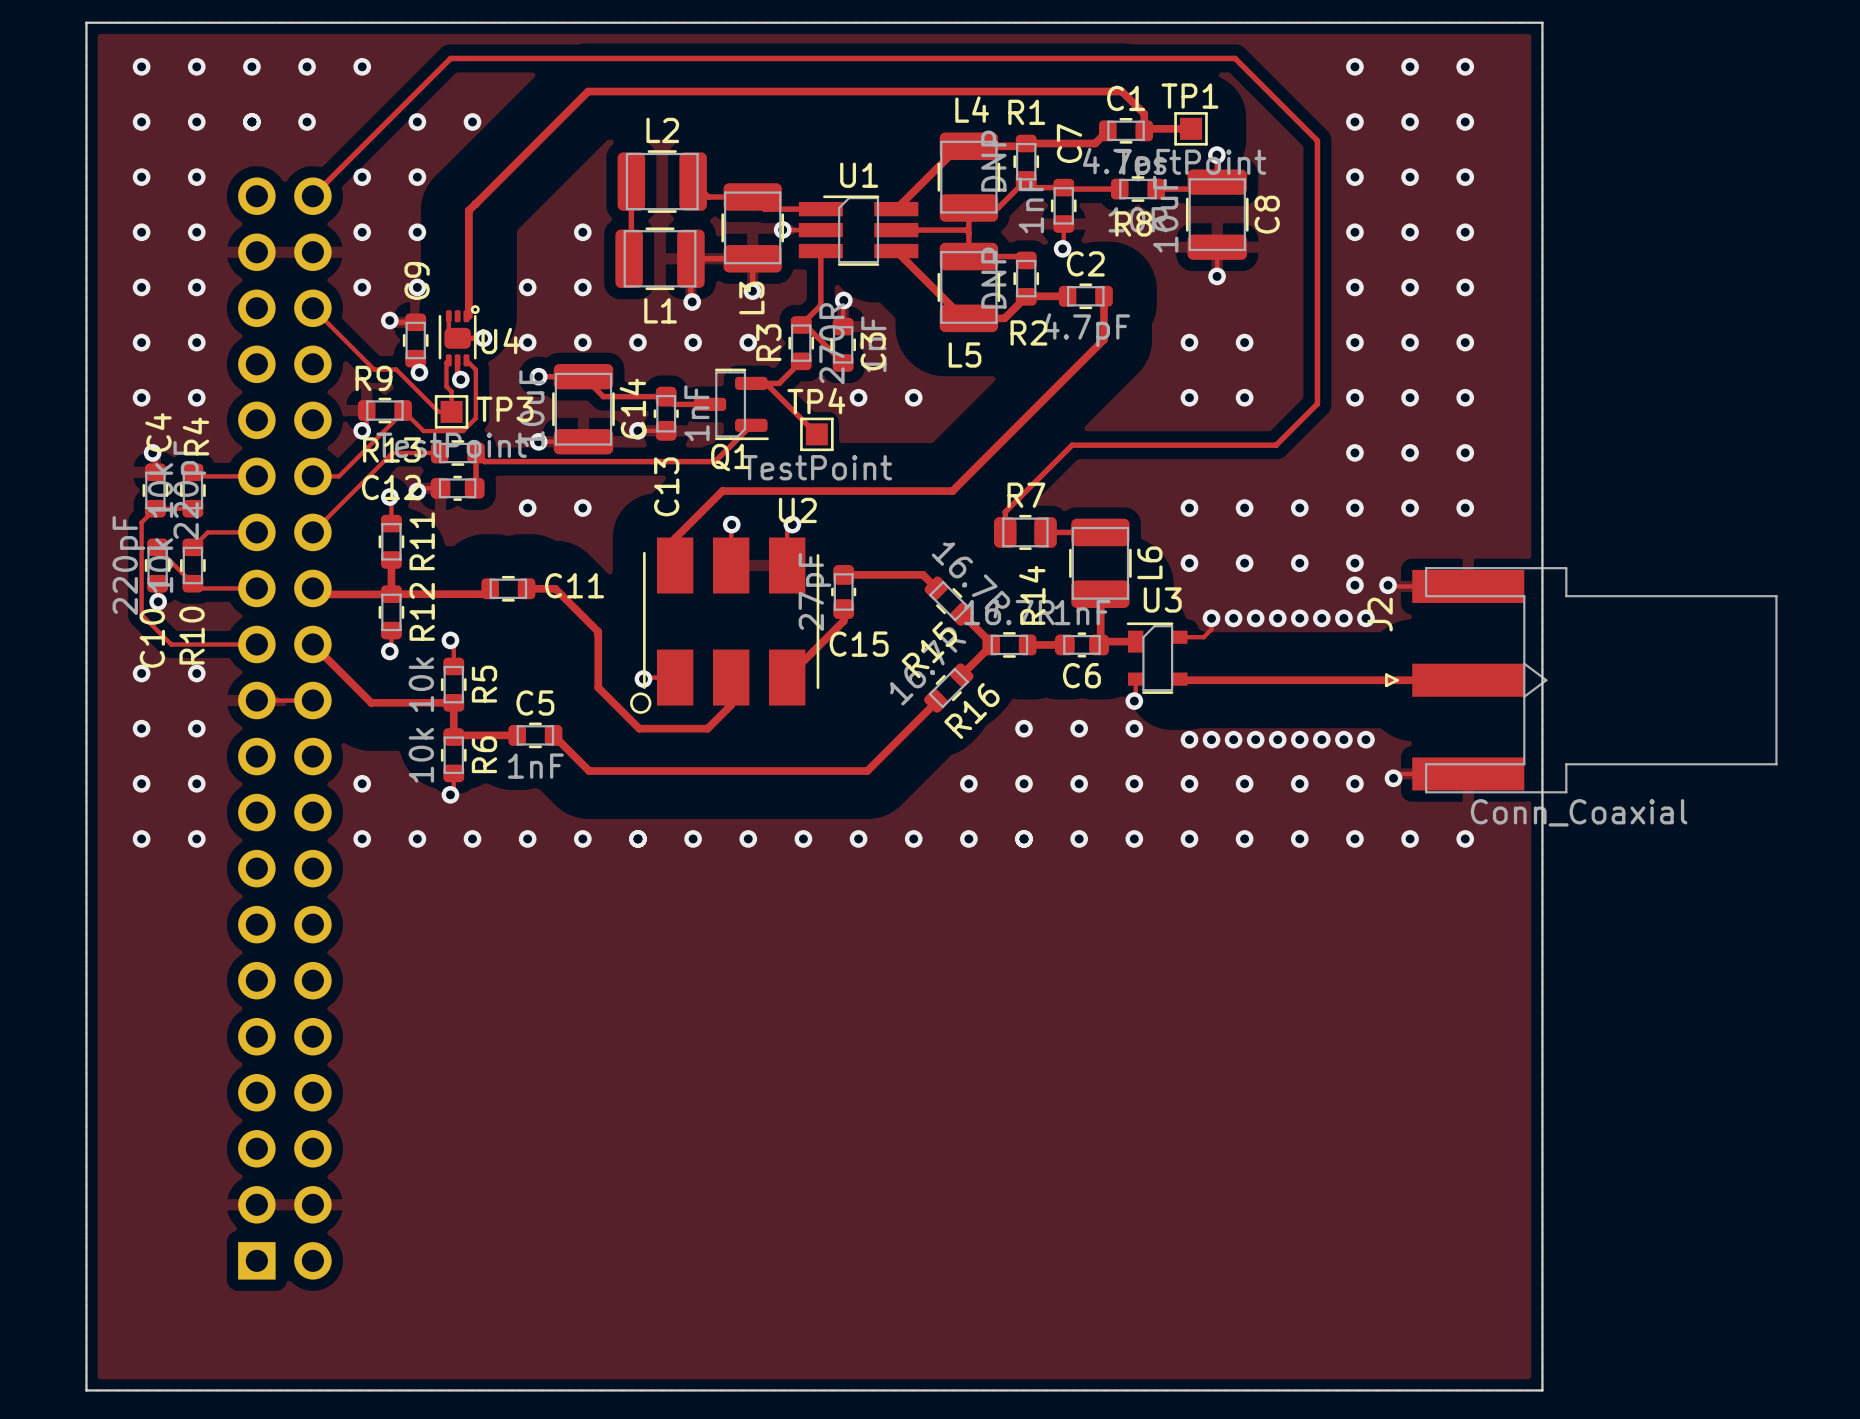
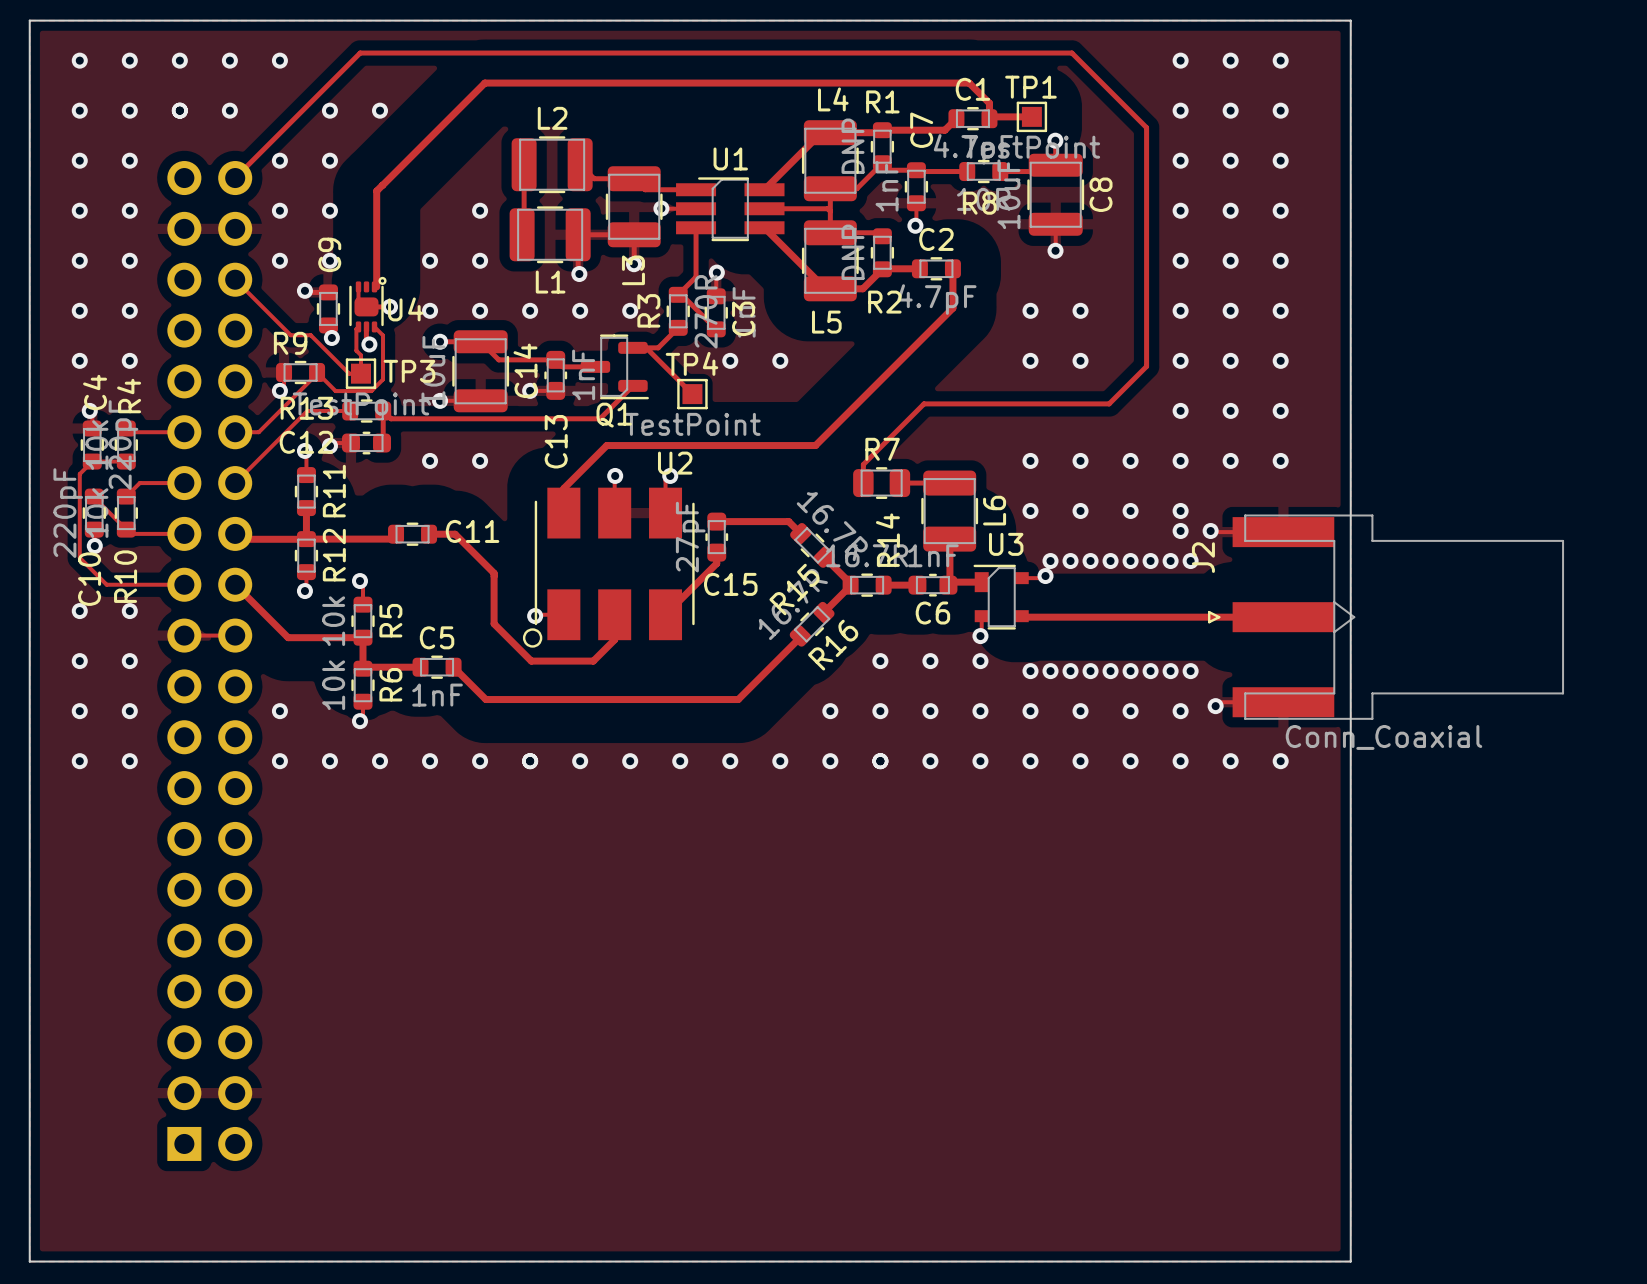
track: (1211, 618) (1211, 629) (1206, 634) -> none
via: none -> (1045, 576)

